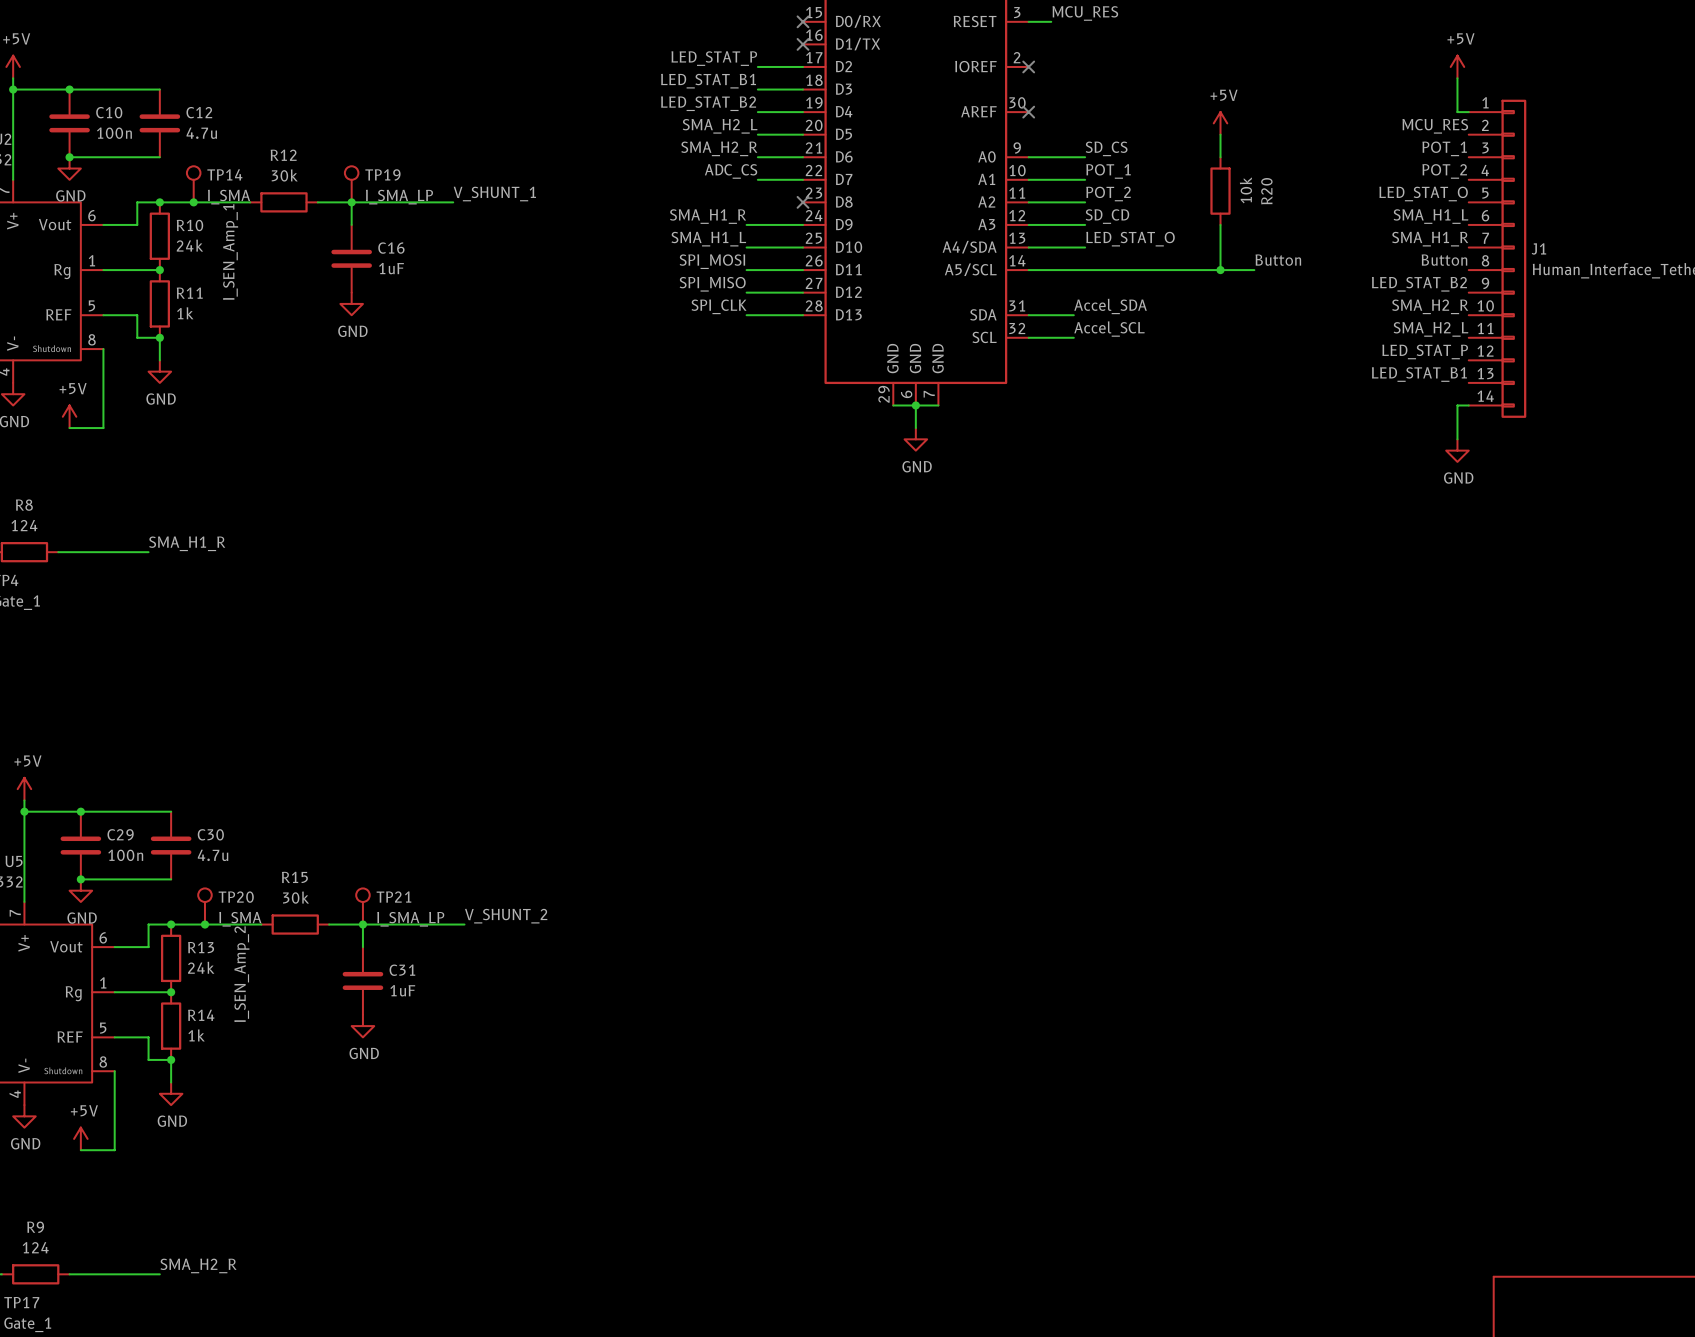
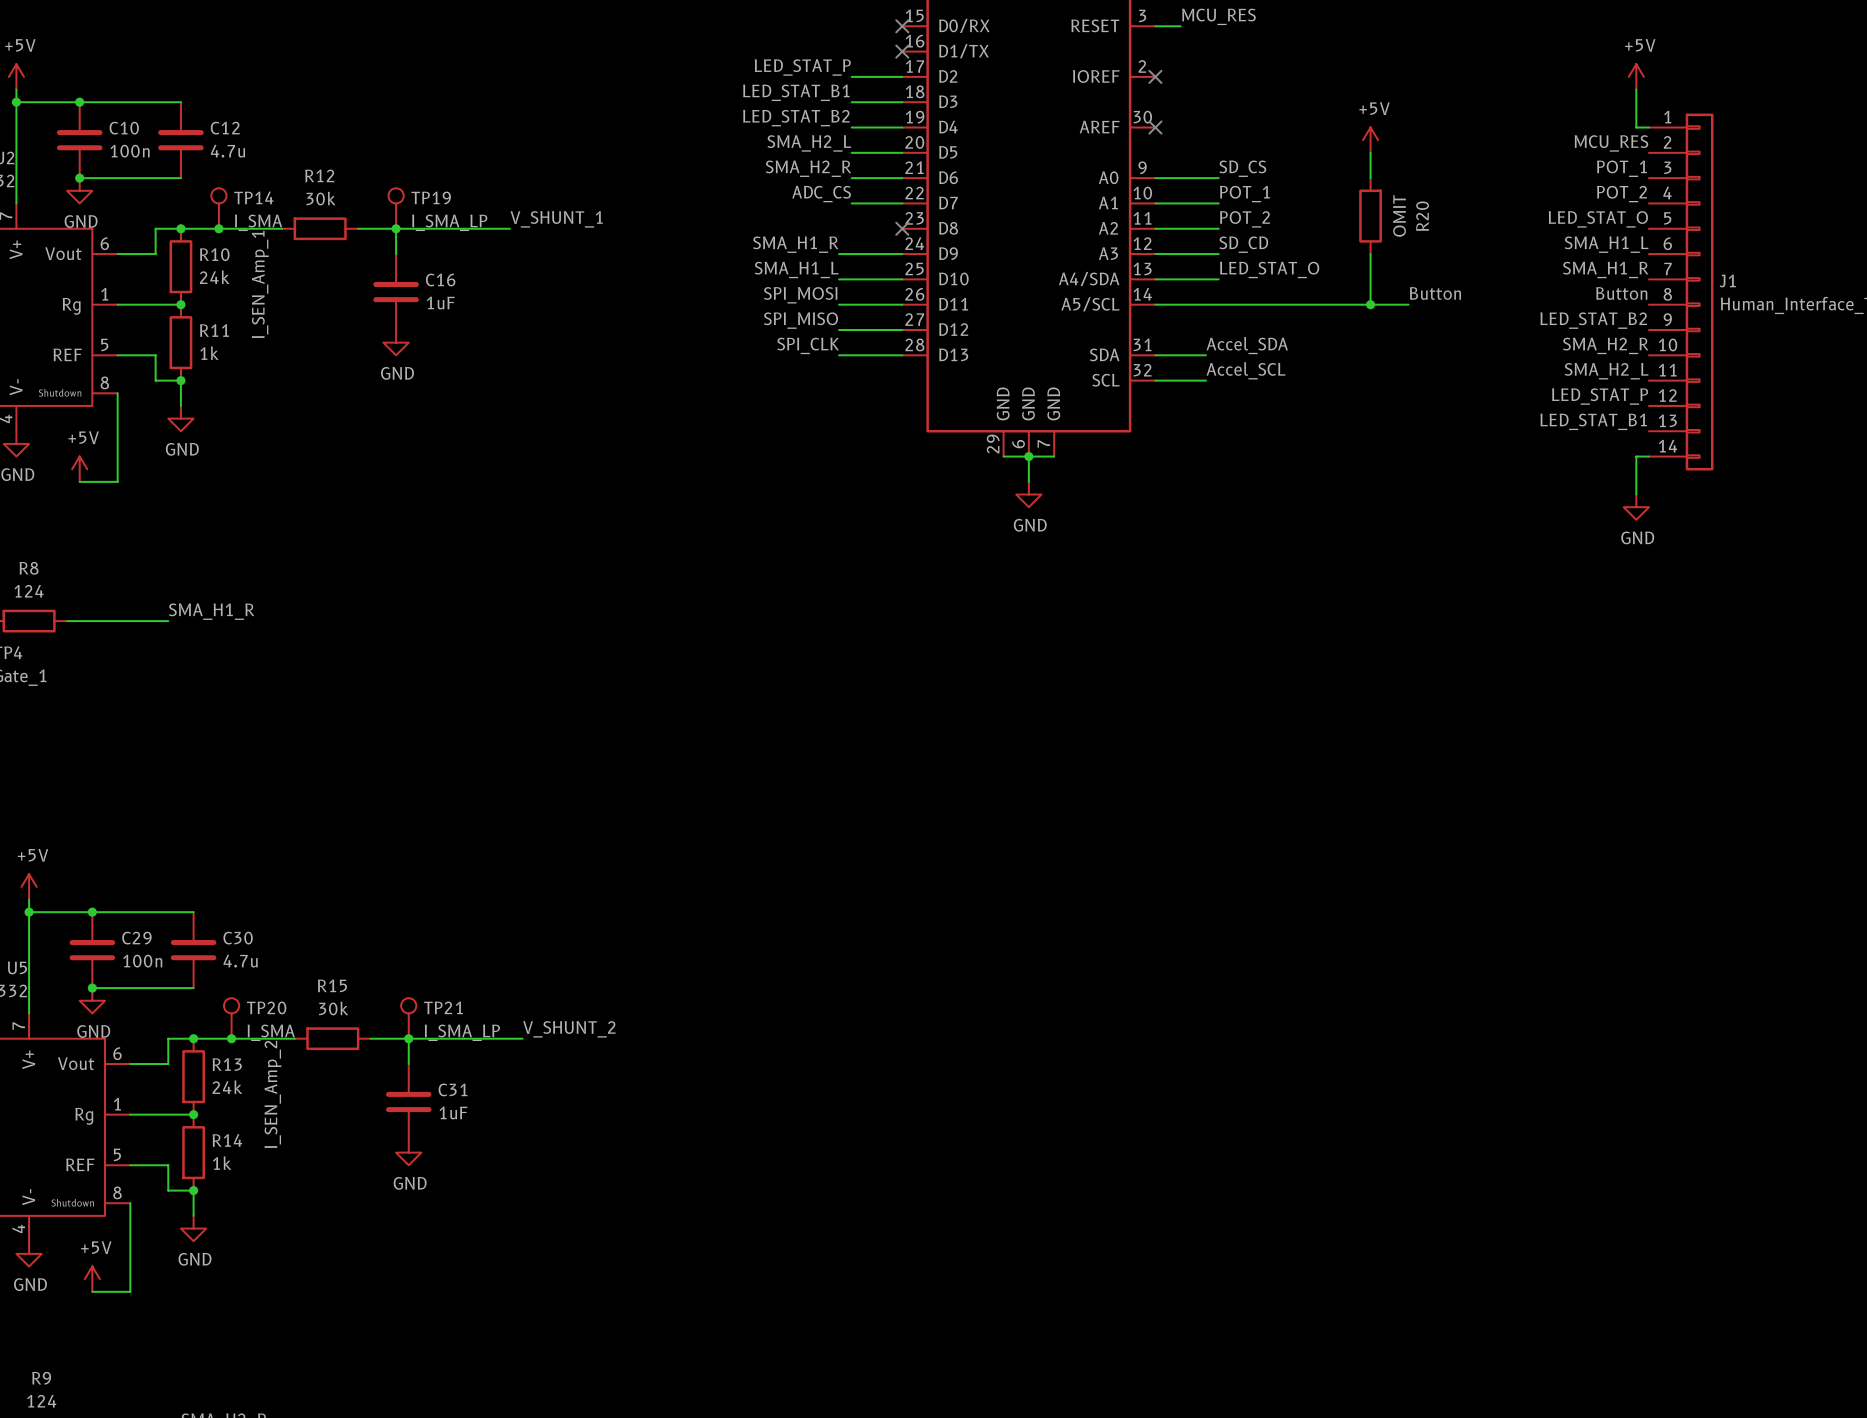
R20 value: 10k (1245, 190) -> OMIT (1399, 215)

